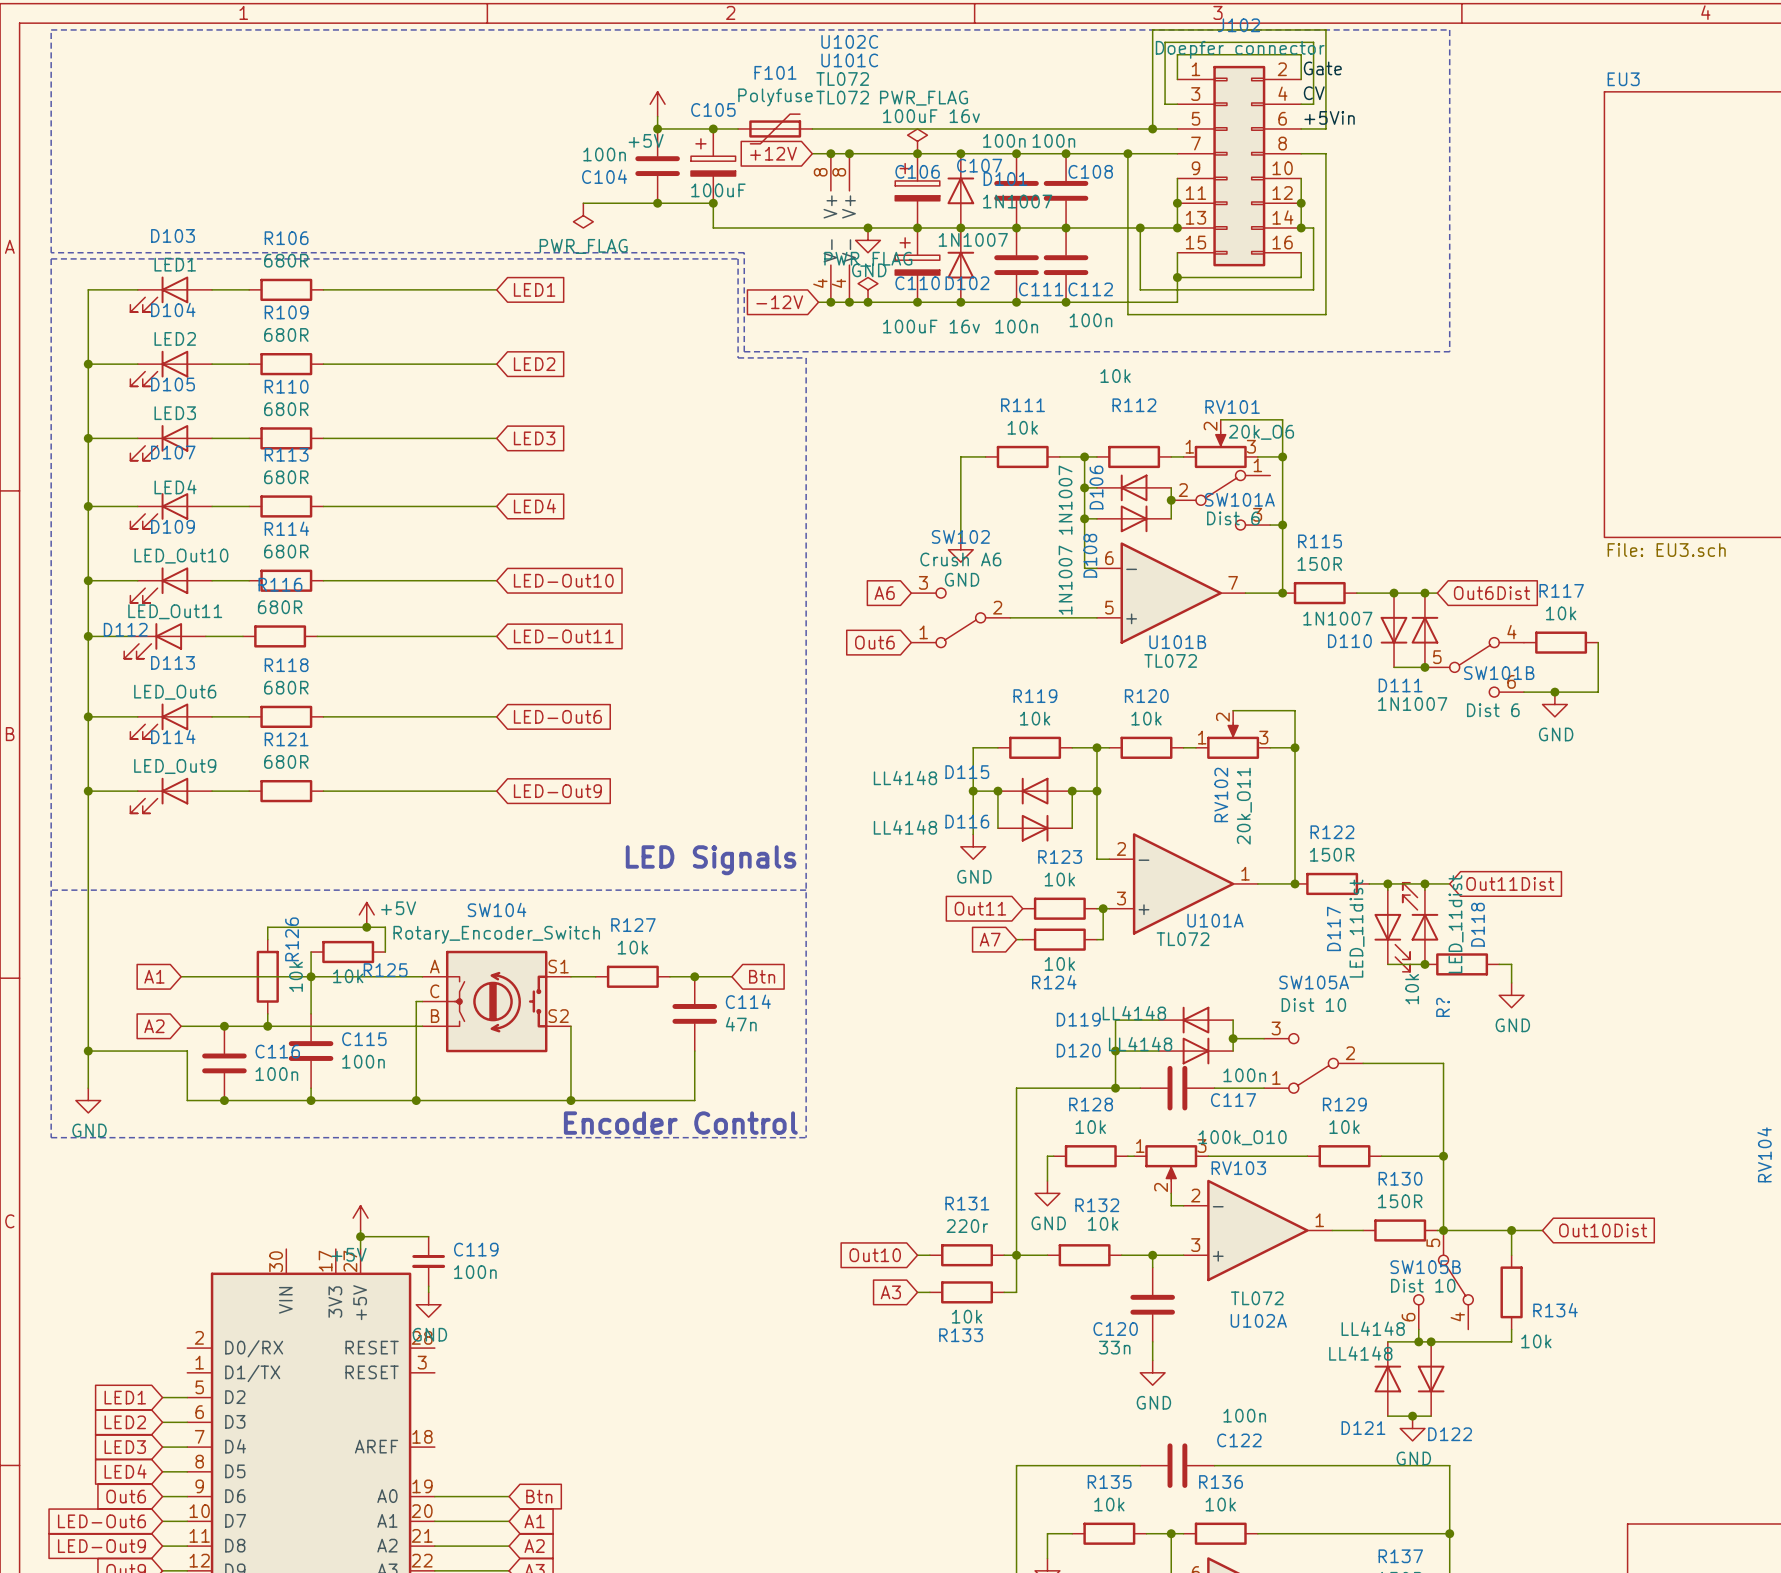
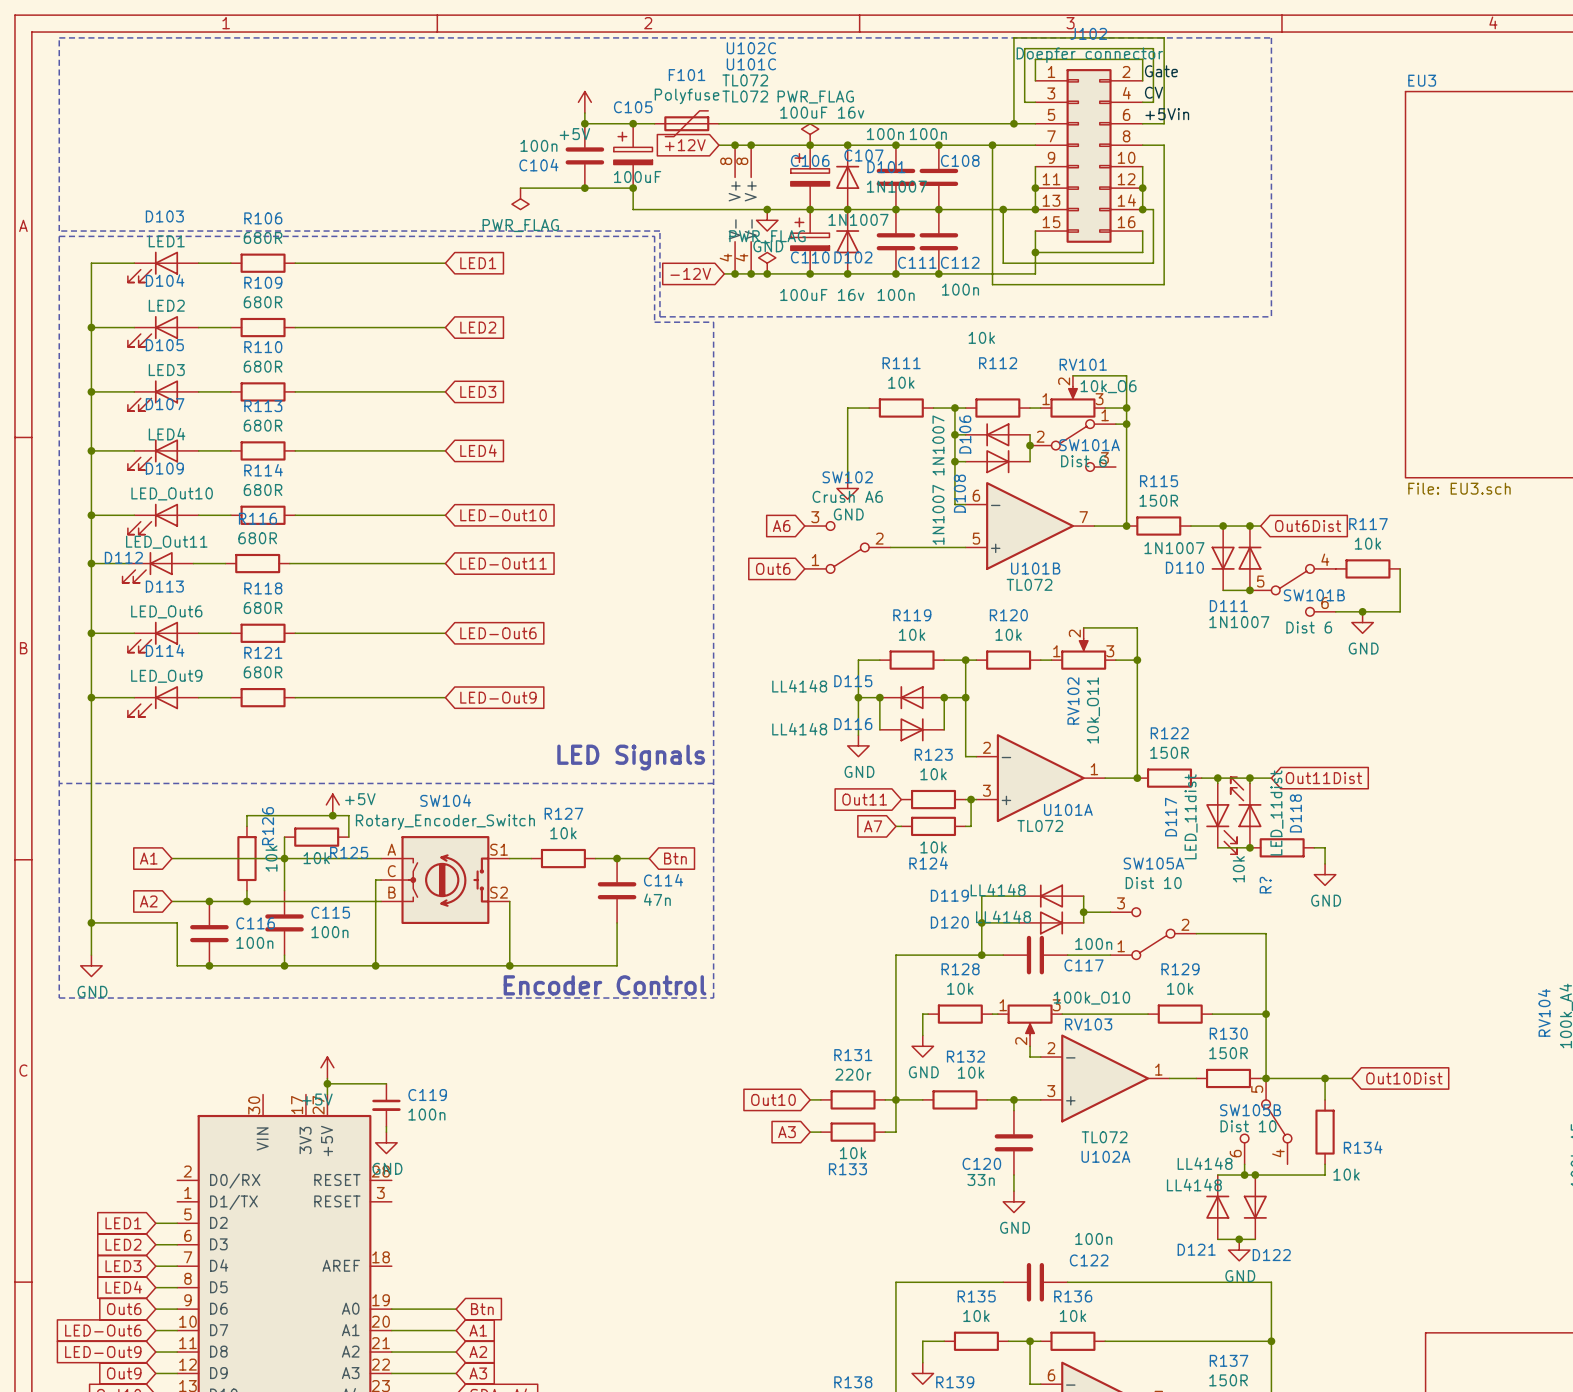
RV101 value: 20k_O6 (1261, 432) -> 10k_O6 (1108, 386)
wire: (1270, 525) (1282, 525) -> (1115, 424) (1126, 424)
junction position: (1282, 525) -> (1126, 424)
RV102 value: 20k_O11 (1244, 806) -> 10k_O11 (1093, 710)

